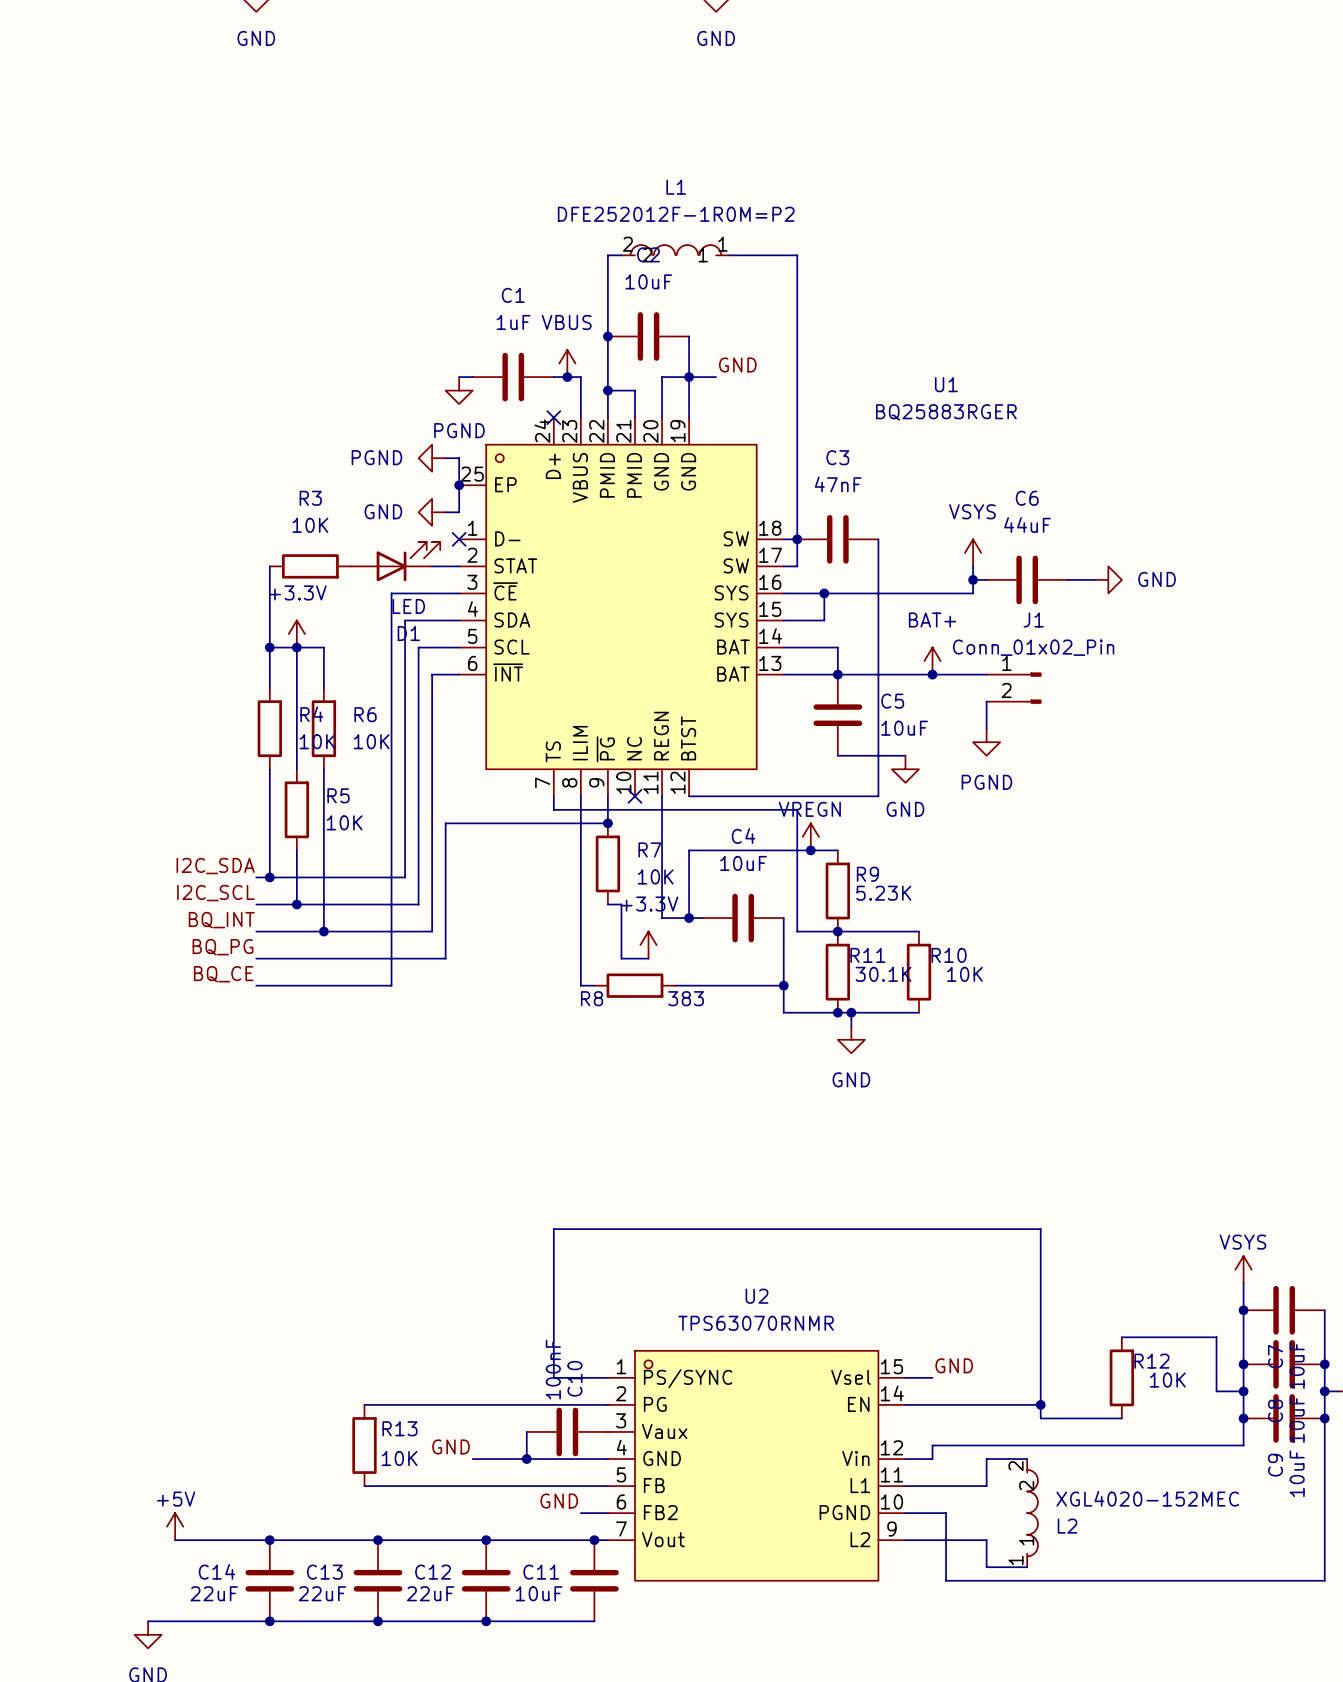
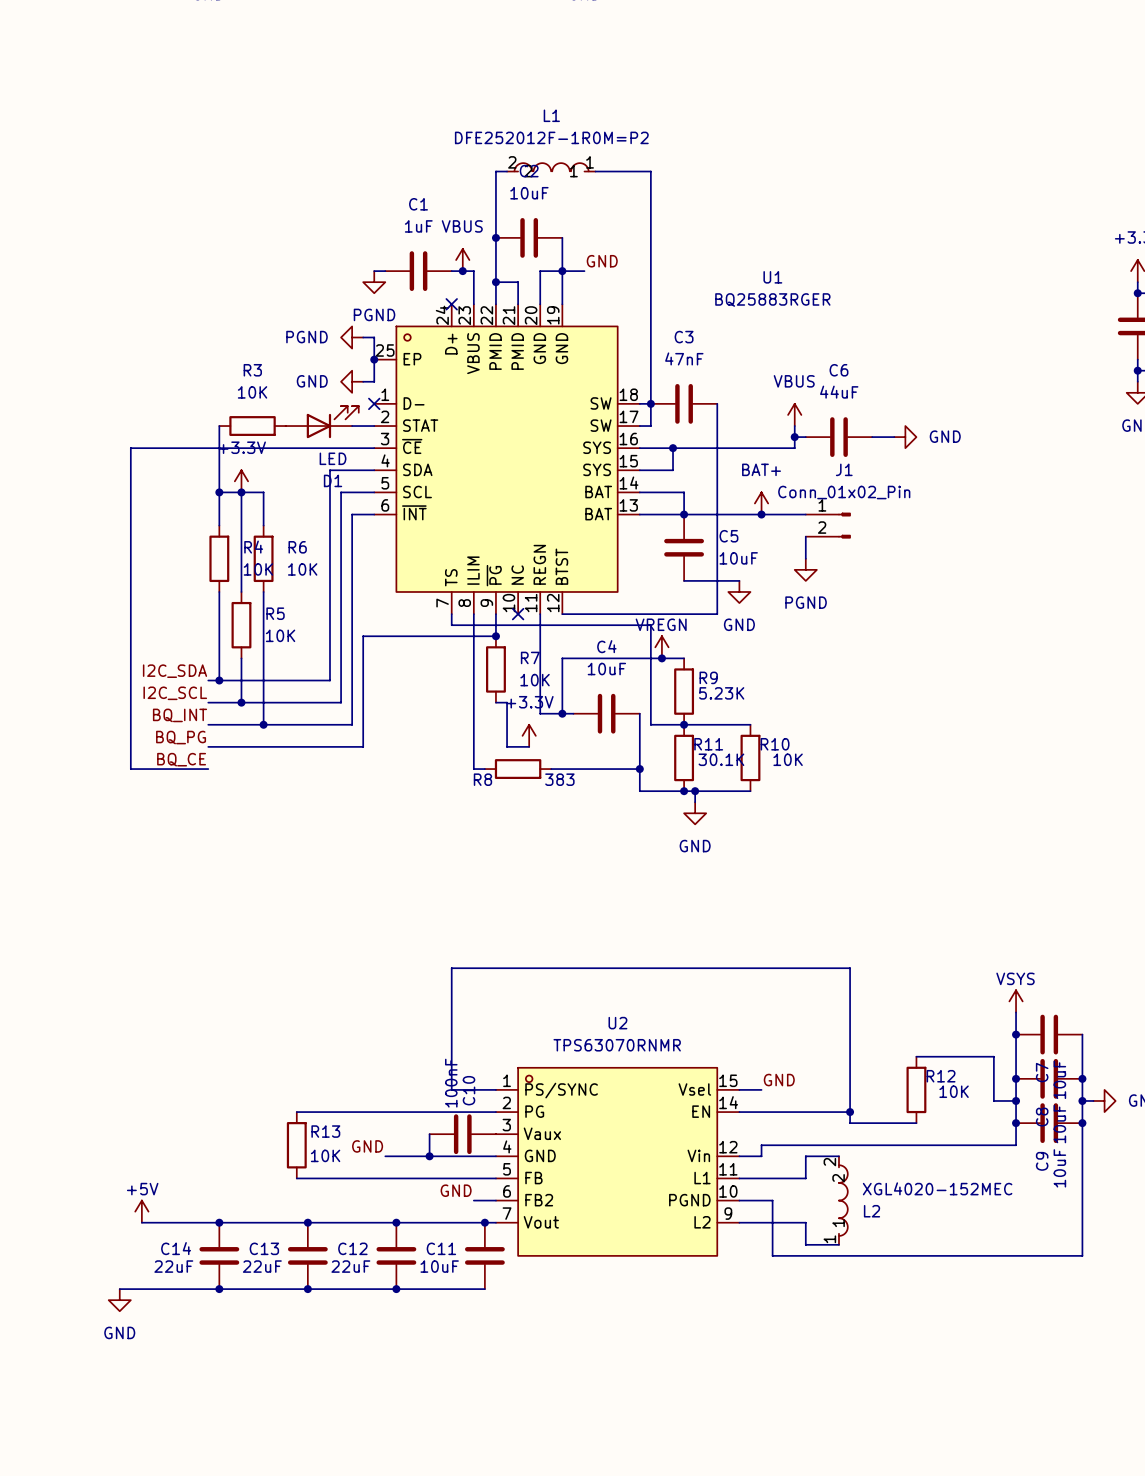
power symbol: VSYS (973, 552) -> VBUS (794, 414)
wire: (391, 593) (391, 985) (256, 985) -> (318, 448) (130, 448) (130, 769) (208, 769)

